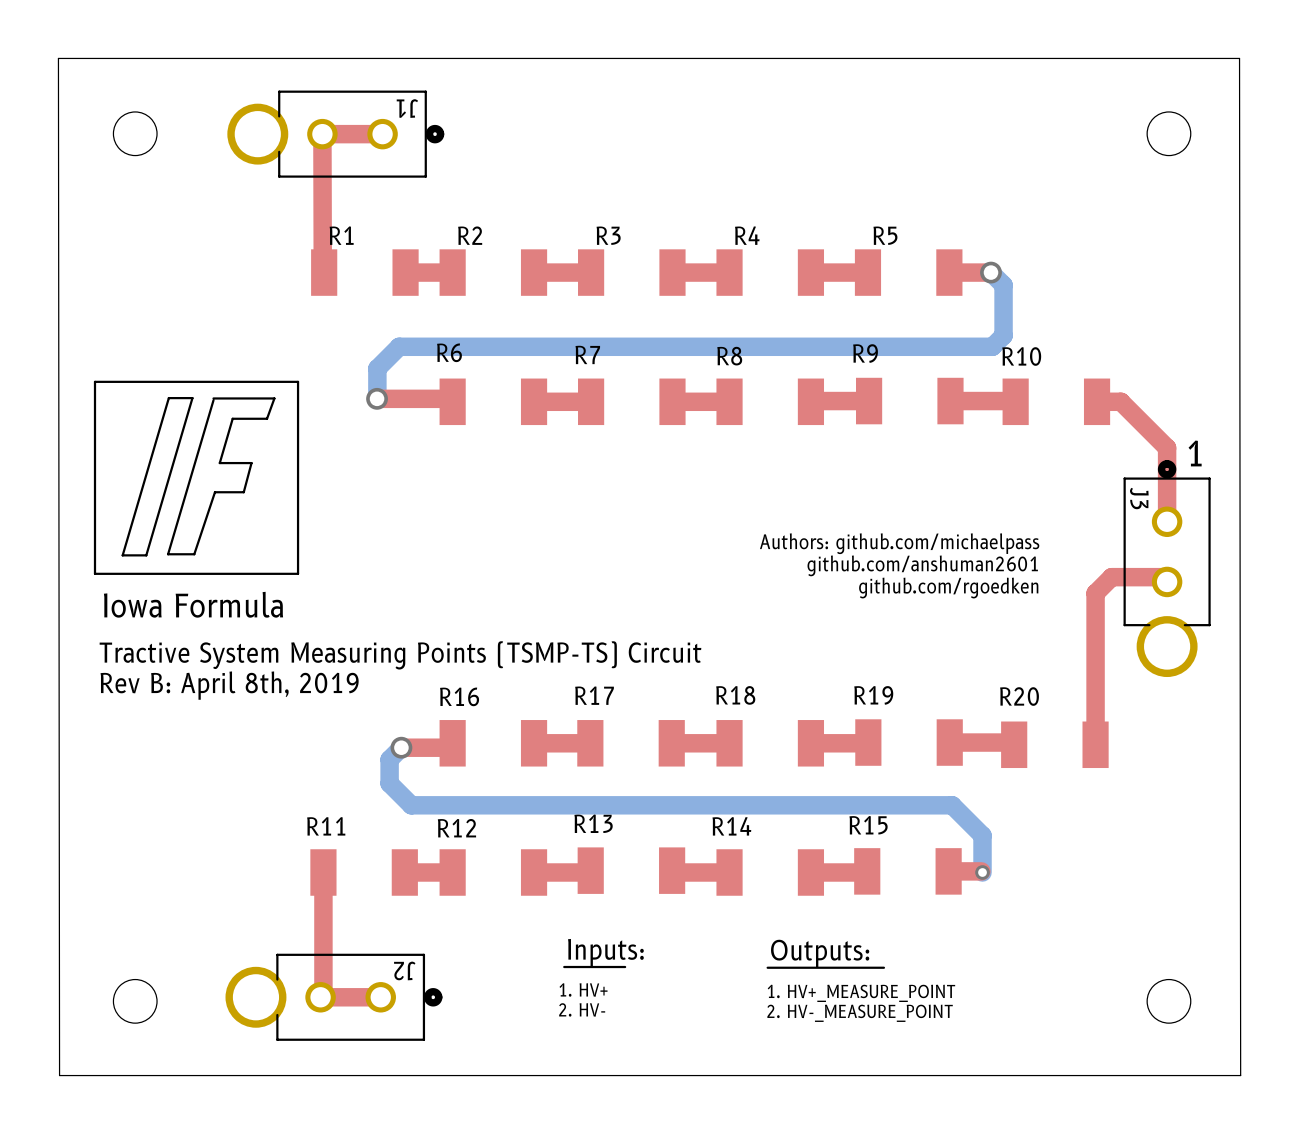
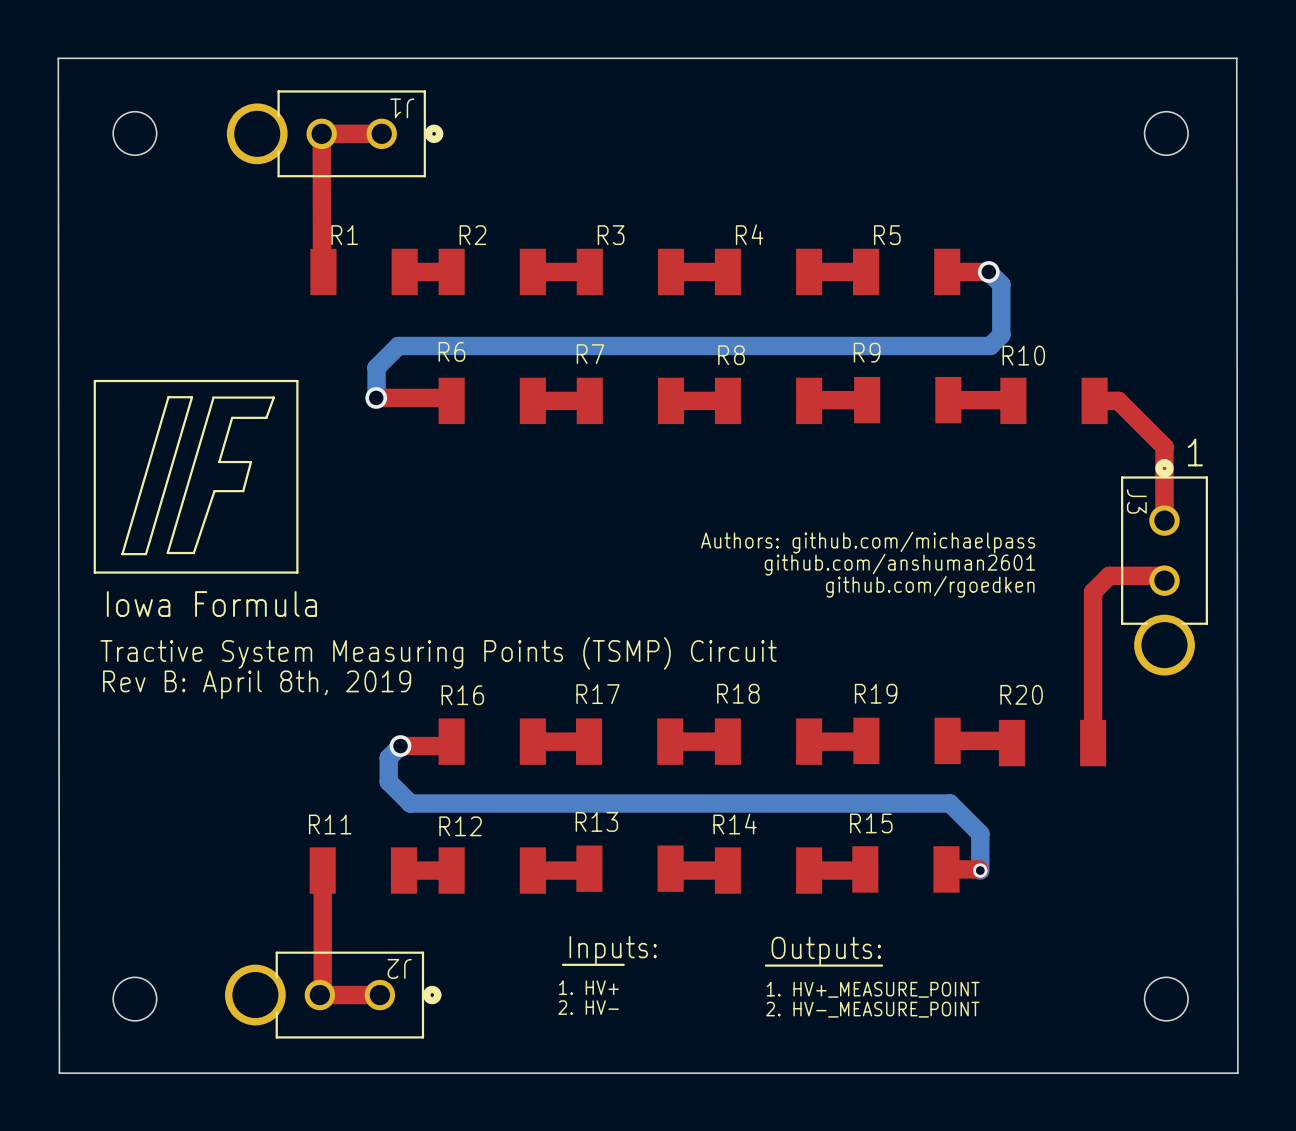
text: Tractive System Measuring Points (TSMP-TS) Circuit (400, 655) -> Tractive System Measuring Points (TSMP) Circuit (438, 653)

